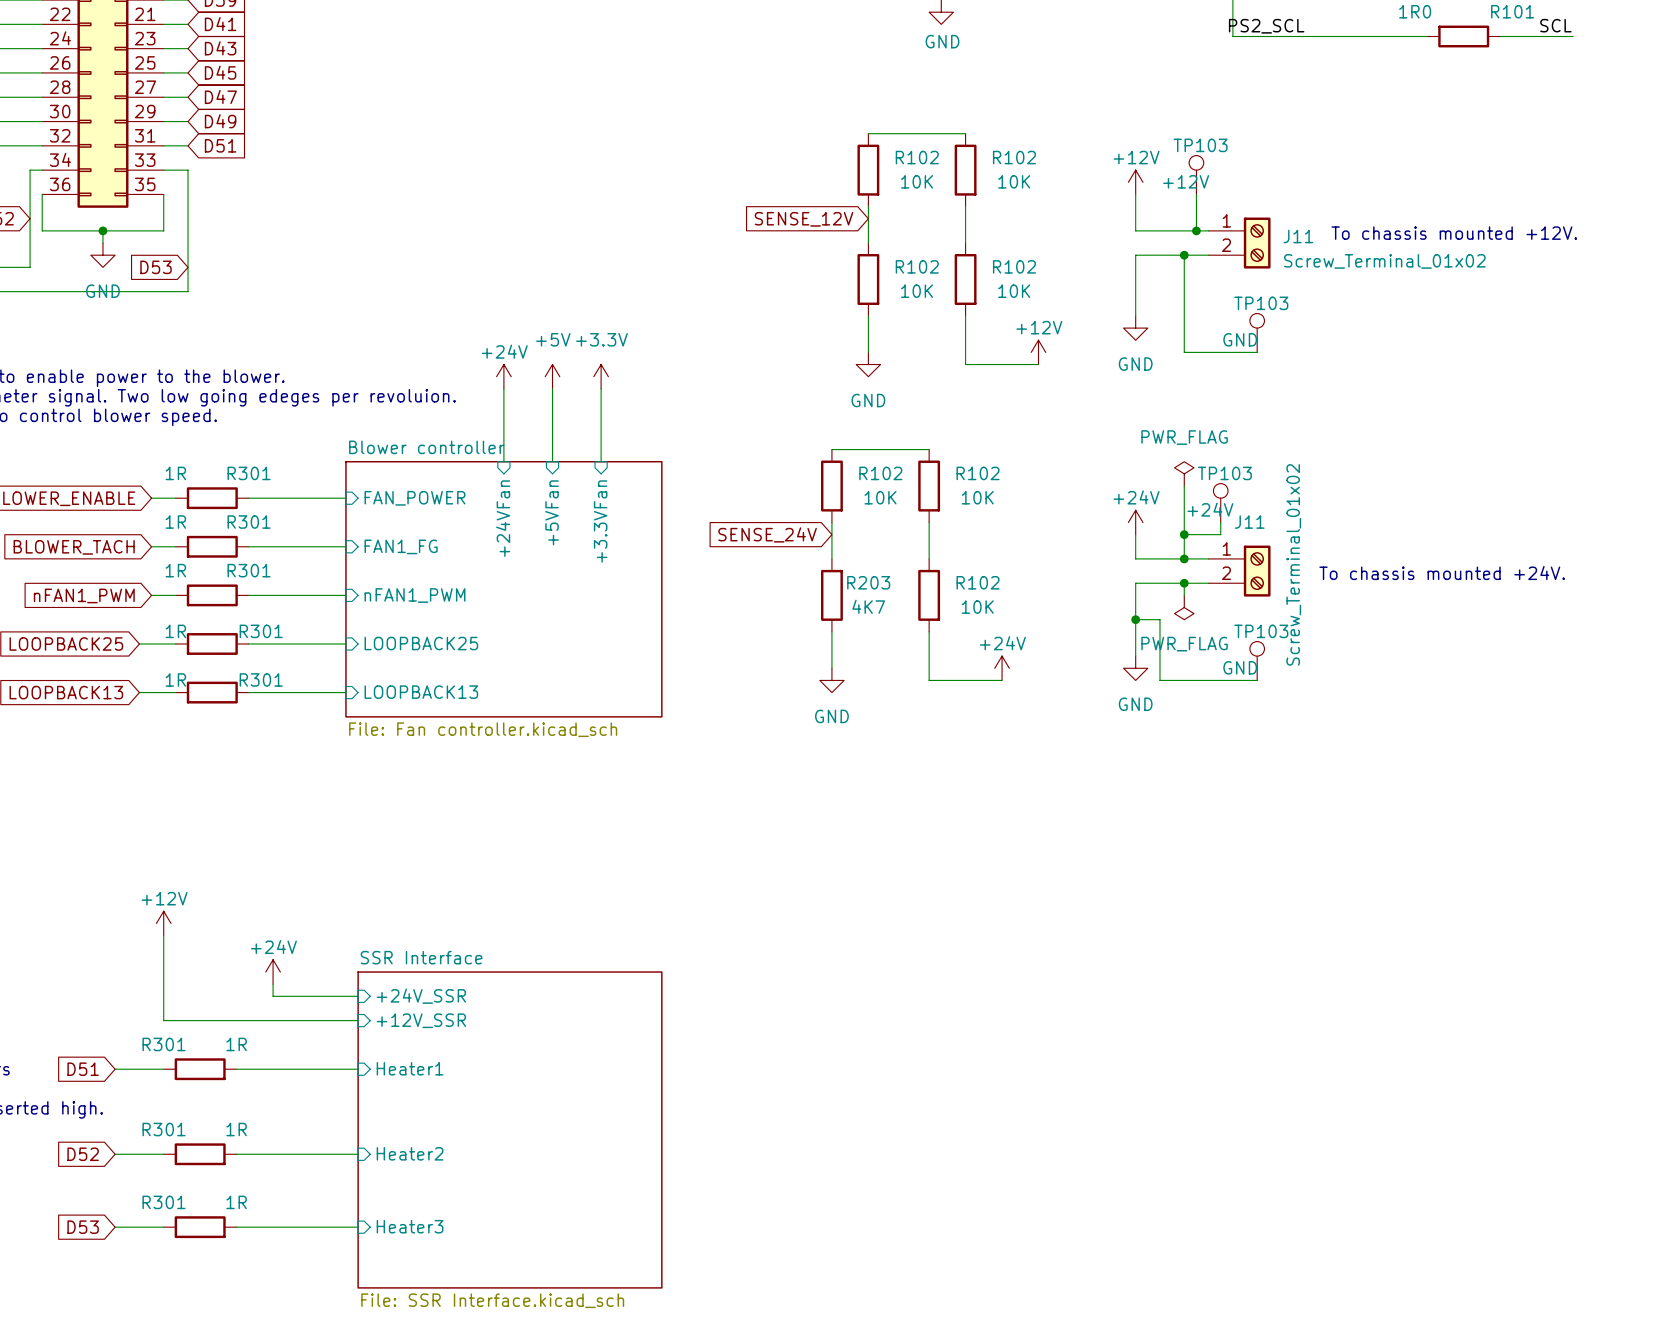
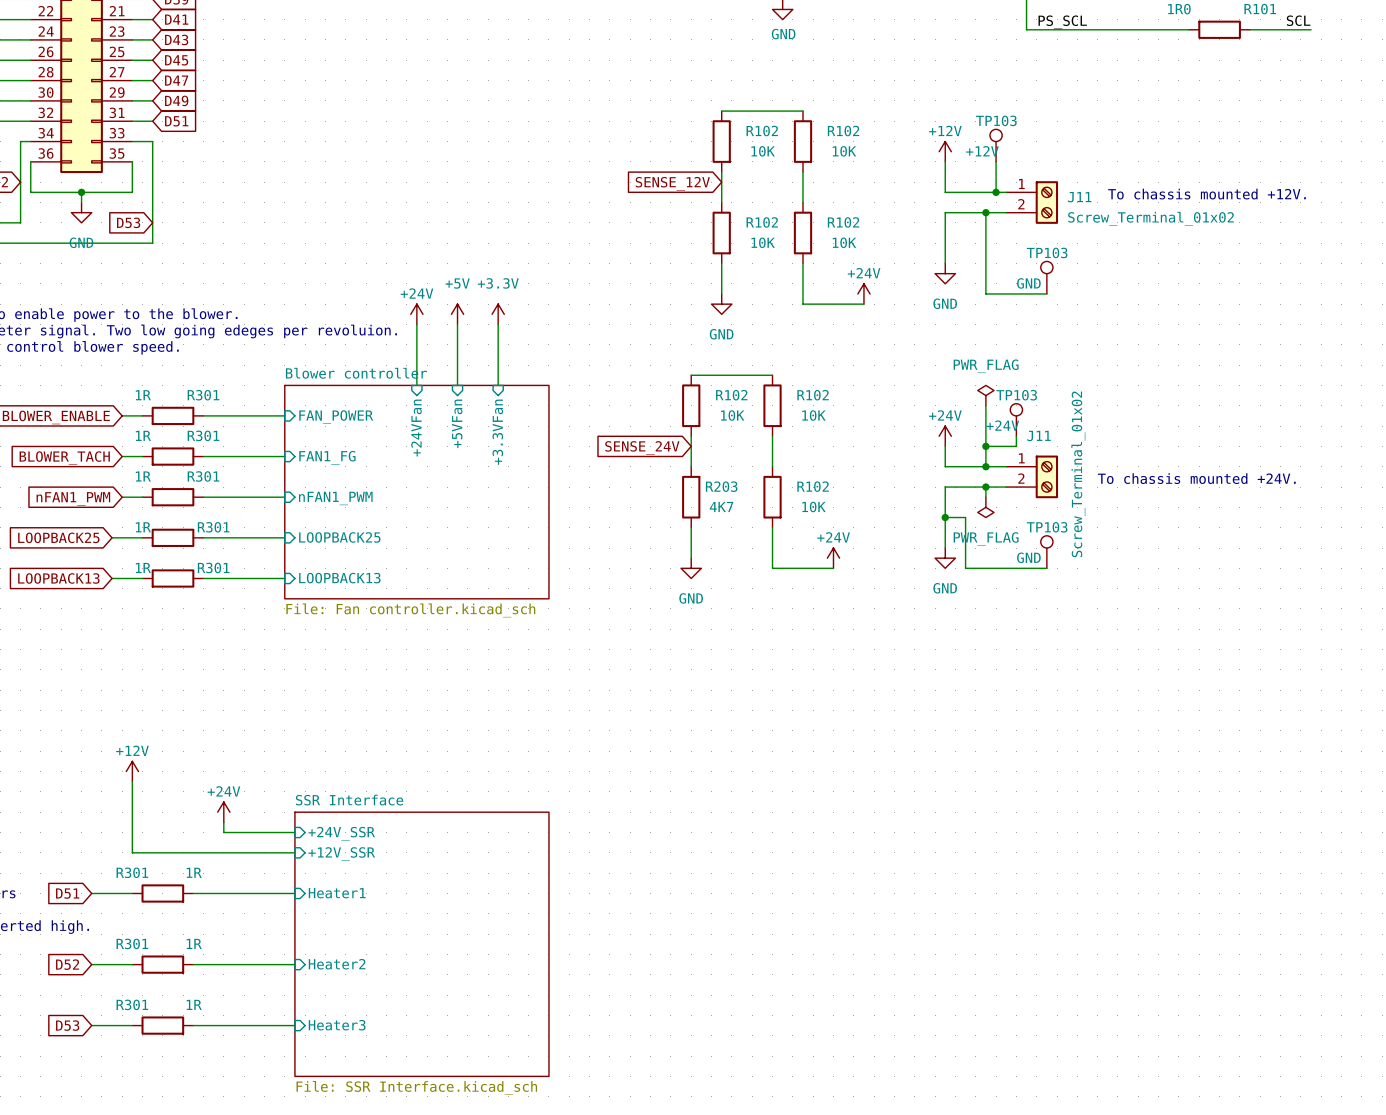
label: PS2_SCL (1266, 26) -> PS_SCL (1062, 22)
power symbol: +12V (1038, 352) -> +24V (863, 293)

